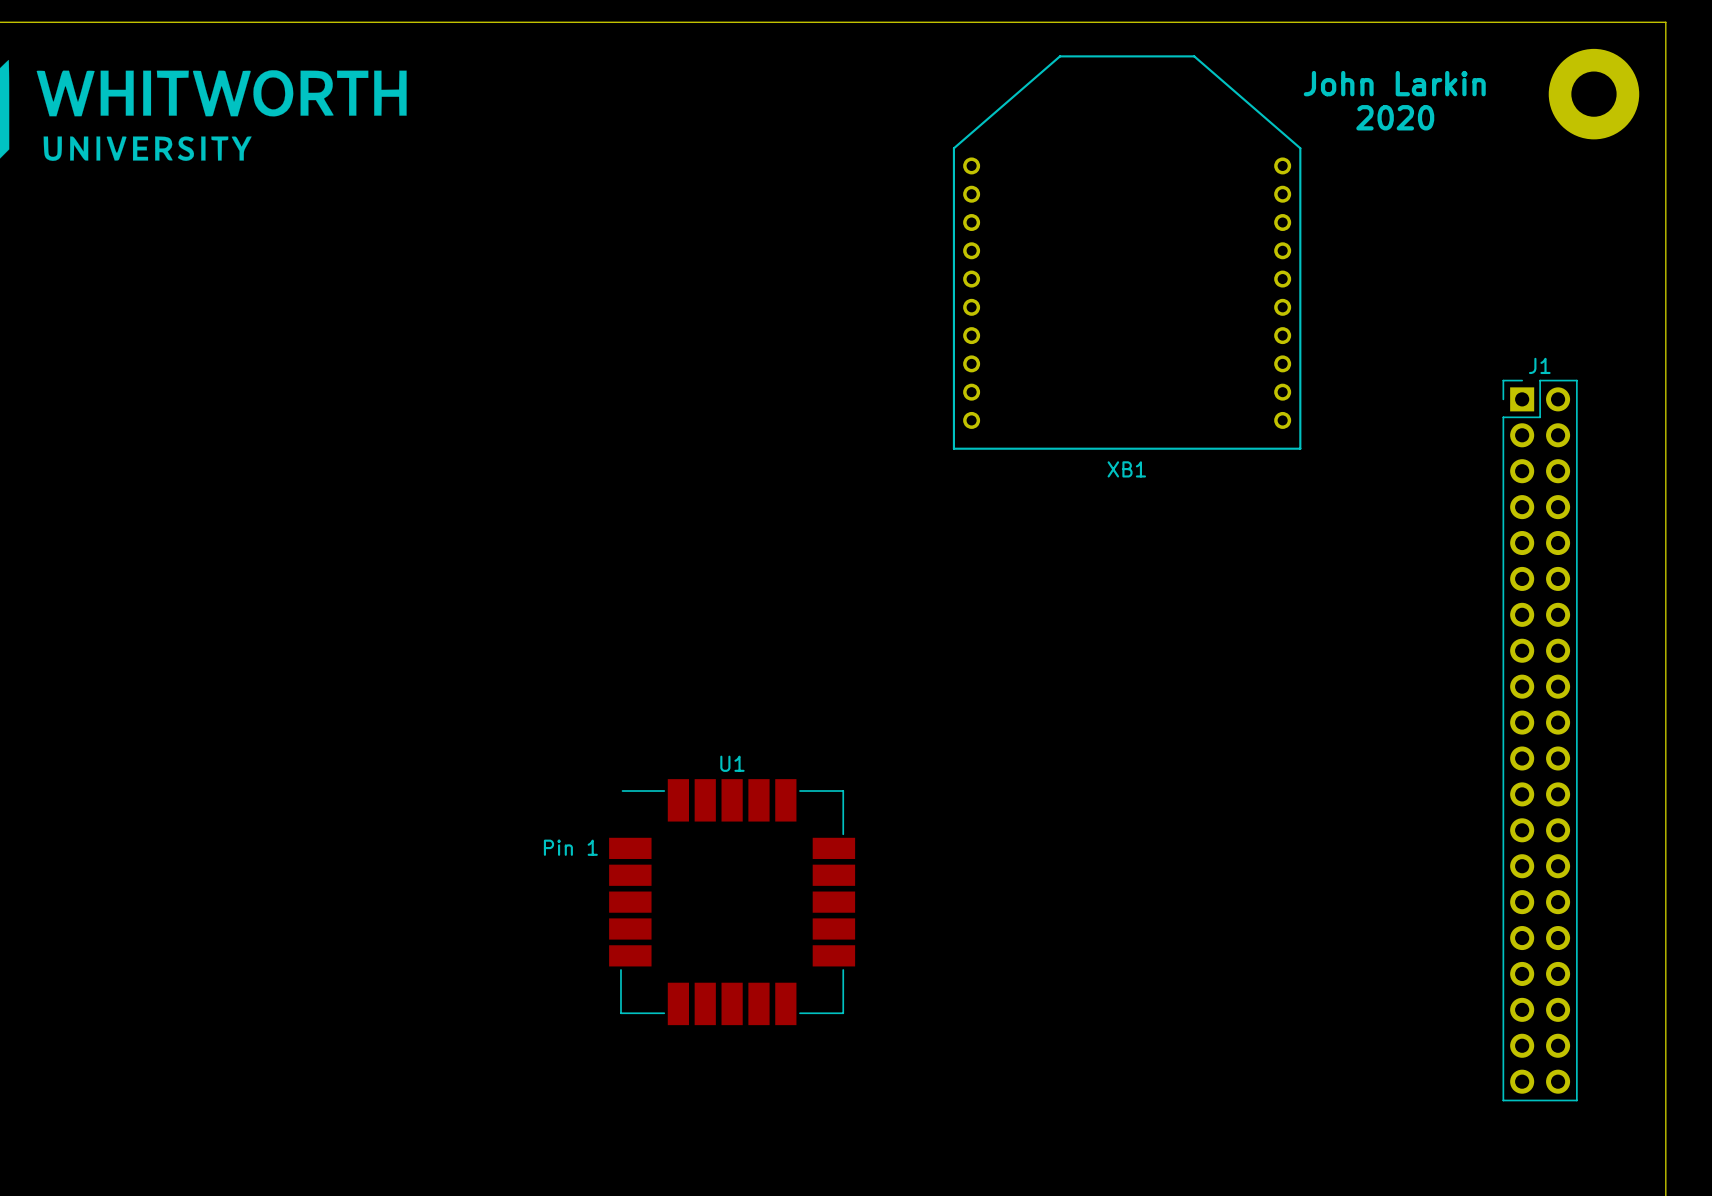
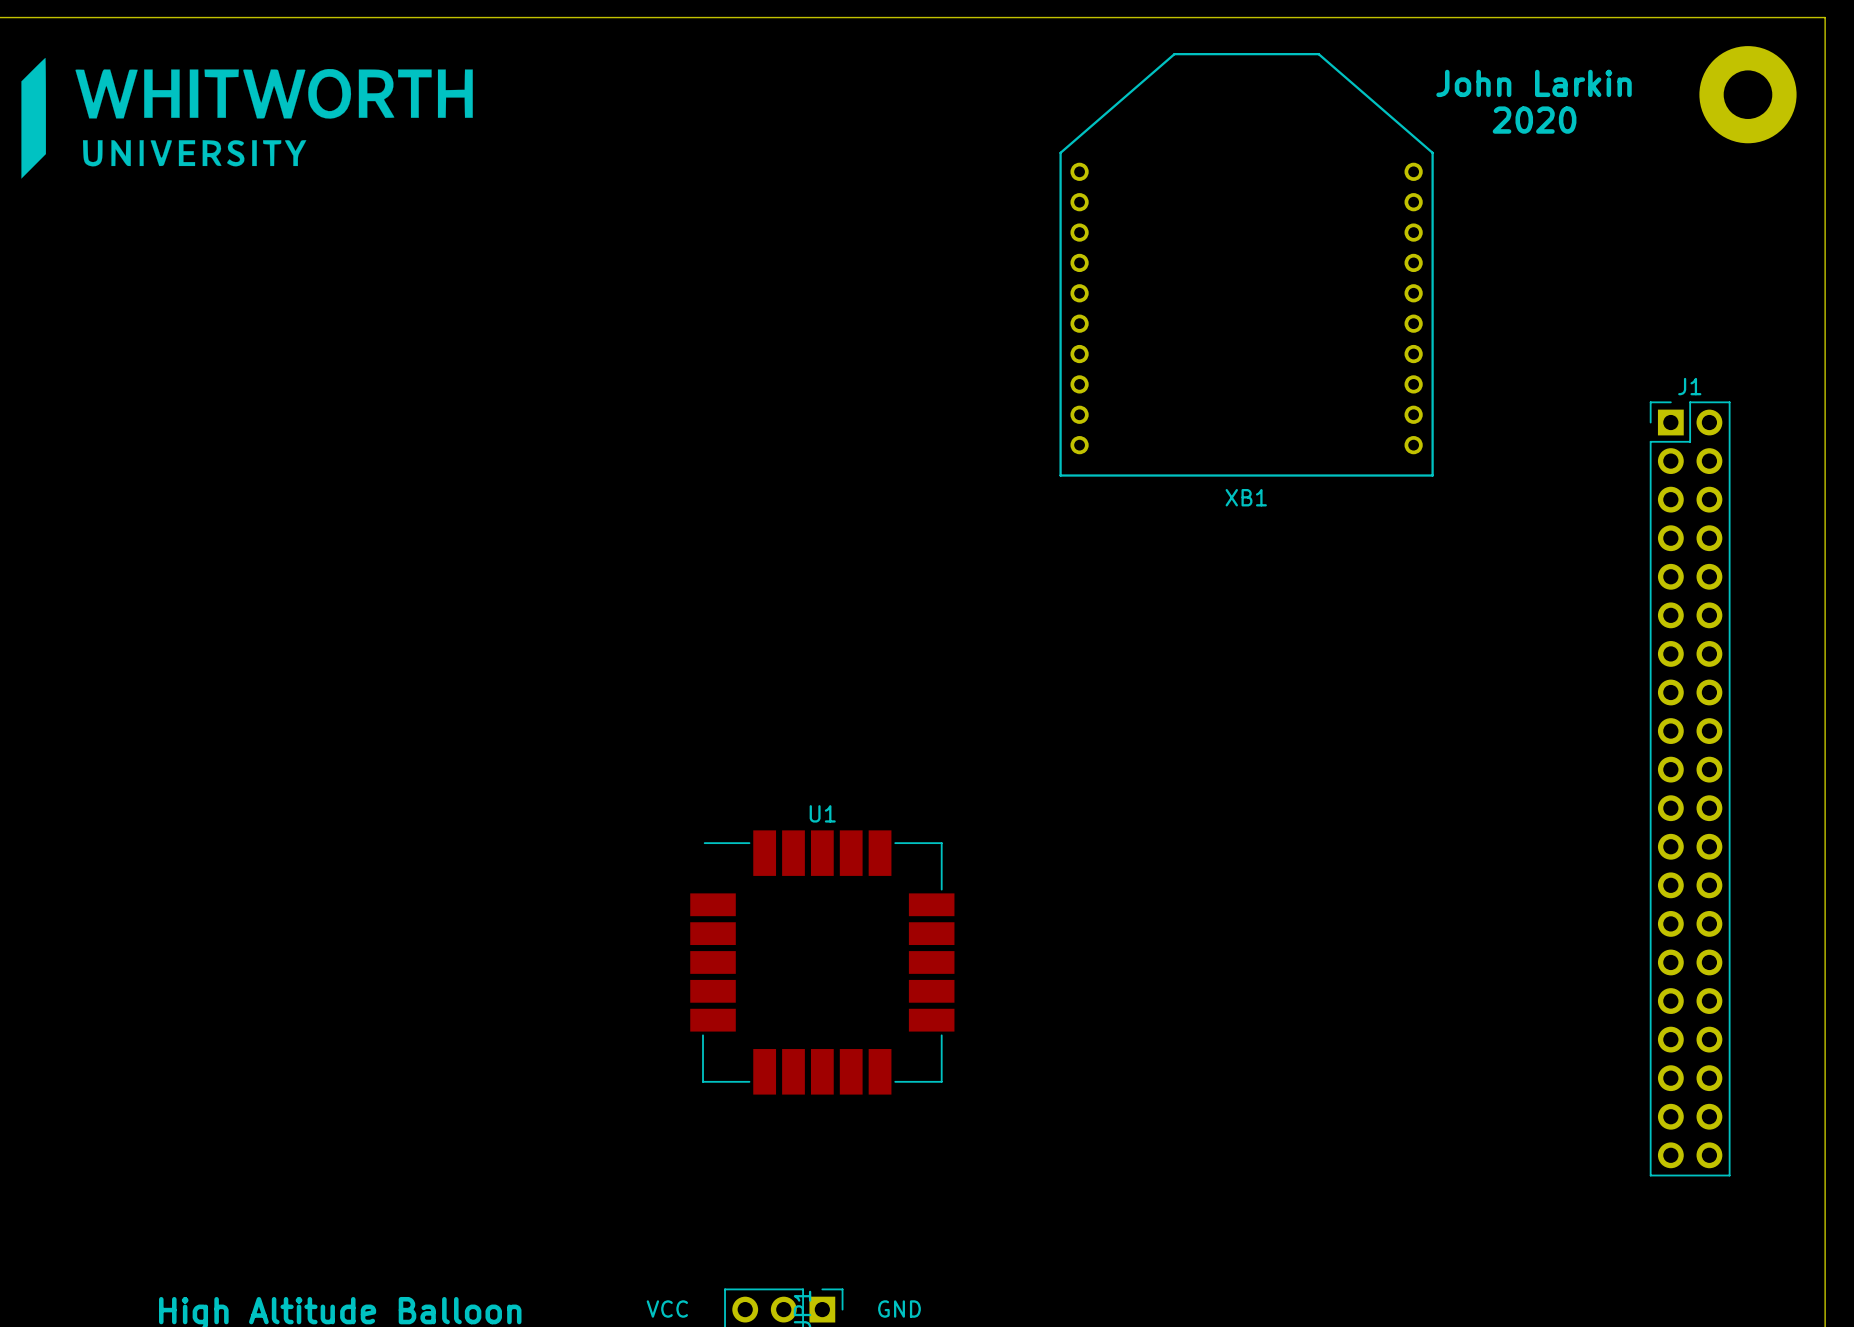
text: Pin 1 (570, 847) -> none

